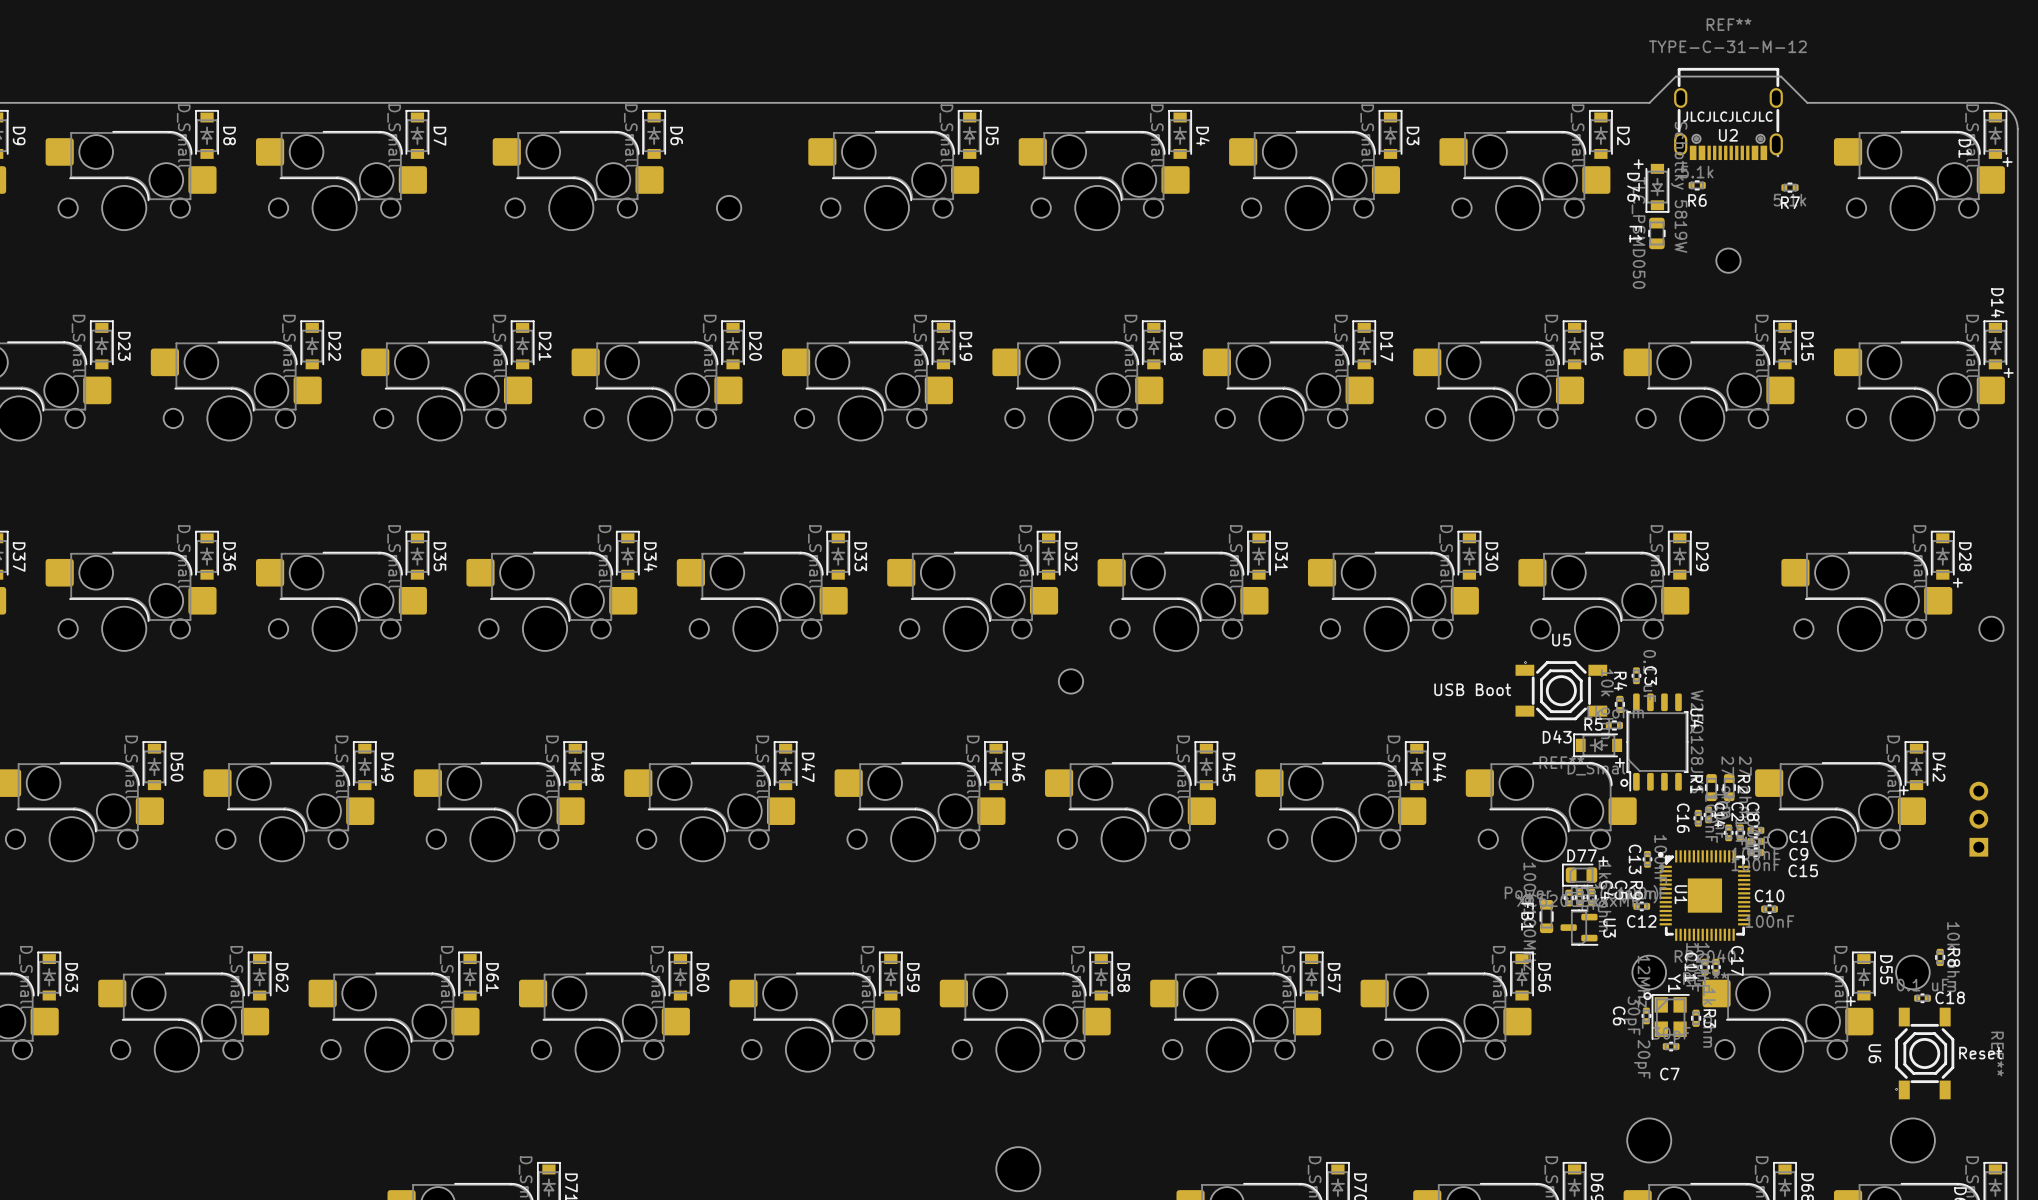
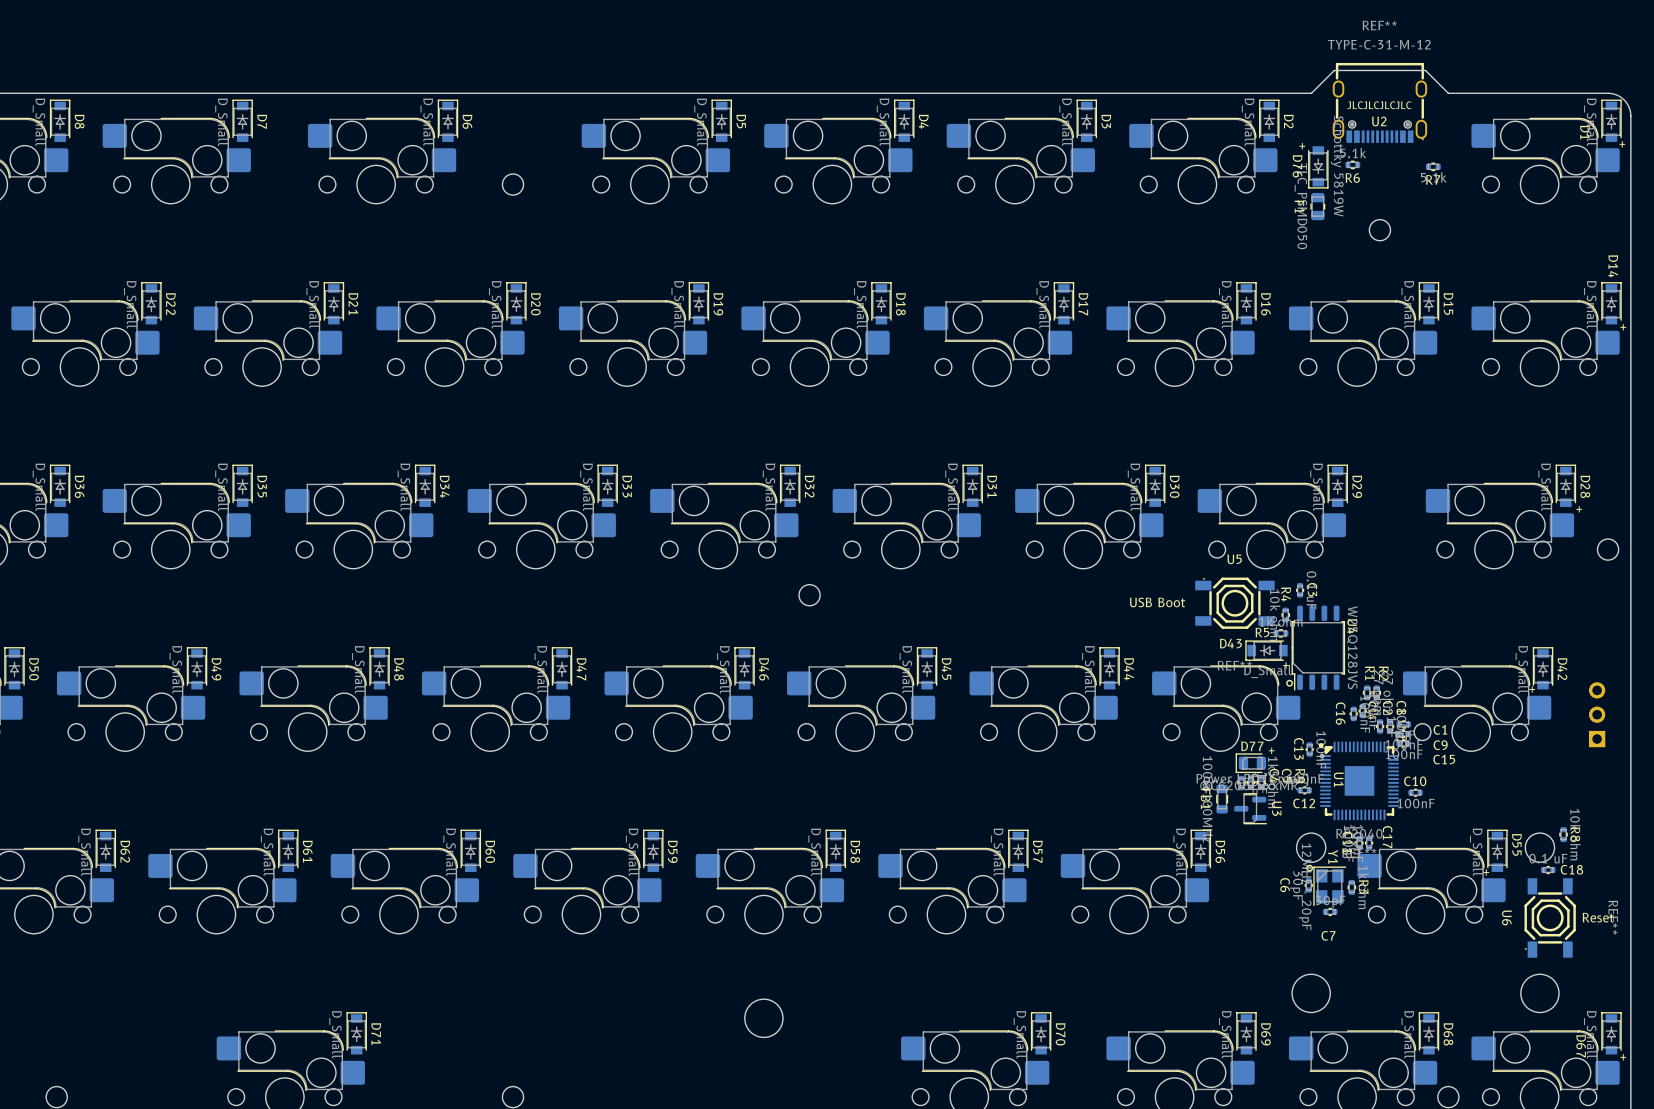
R1 footprint: [1705, 774, 1719, 802] -> [1362, 685, 1372, 701]
R2 footprint: [1722, 774, 1736, 802] -> [1372, 685, 1381, 701]
R1 name position: R1 (1696, 784) -> R1 (1369, 673)

